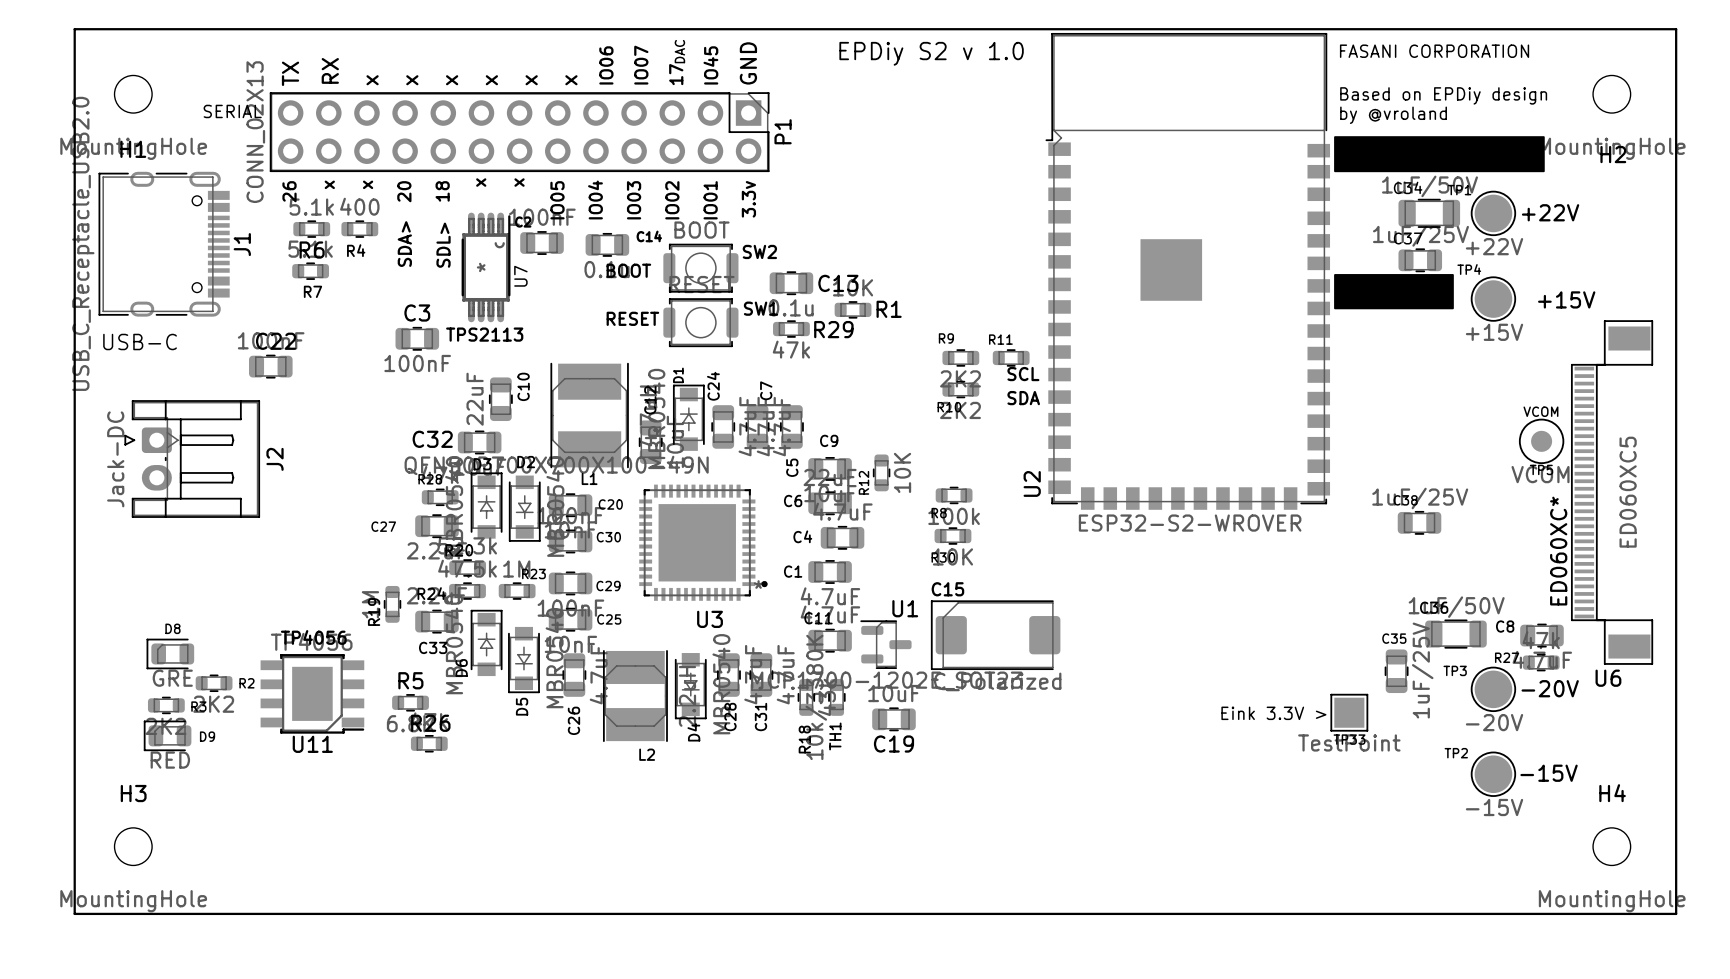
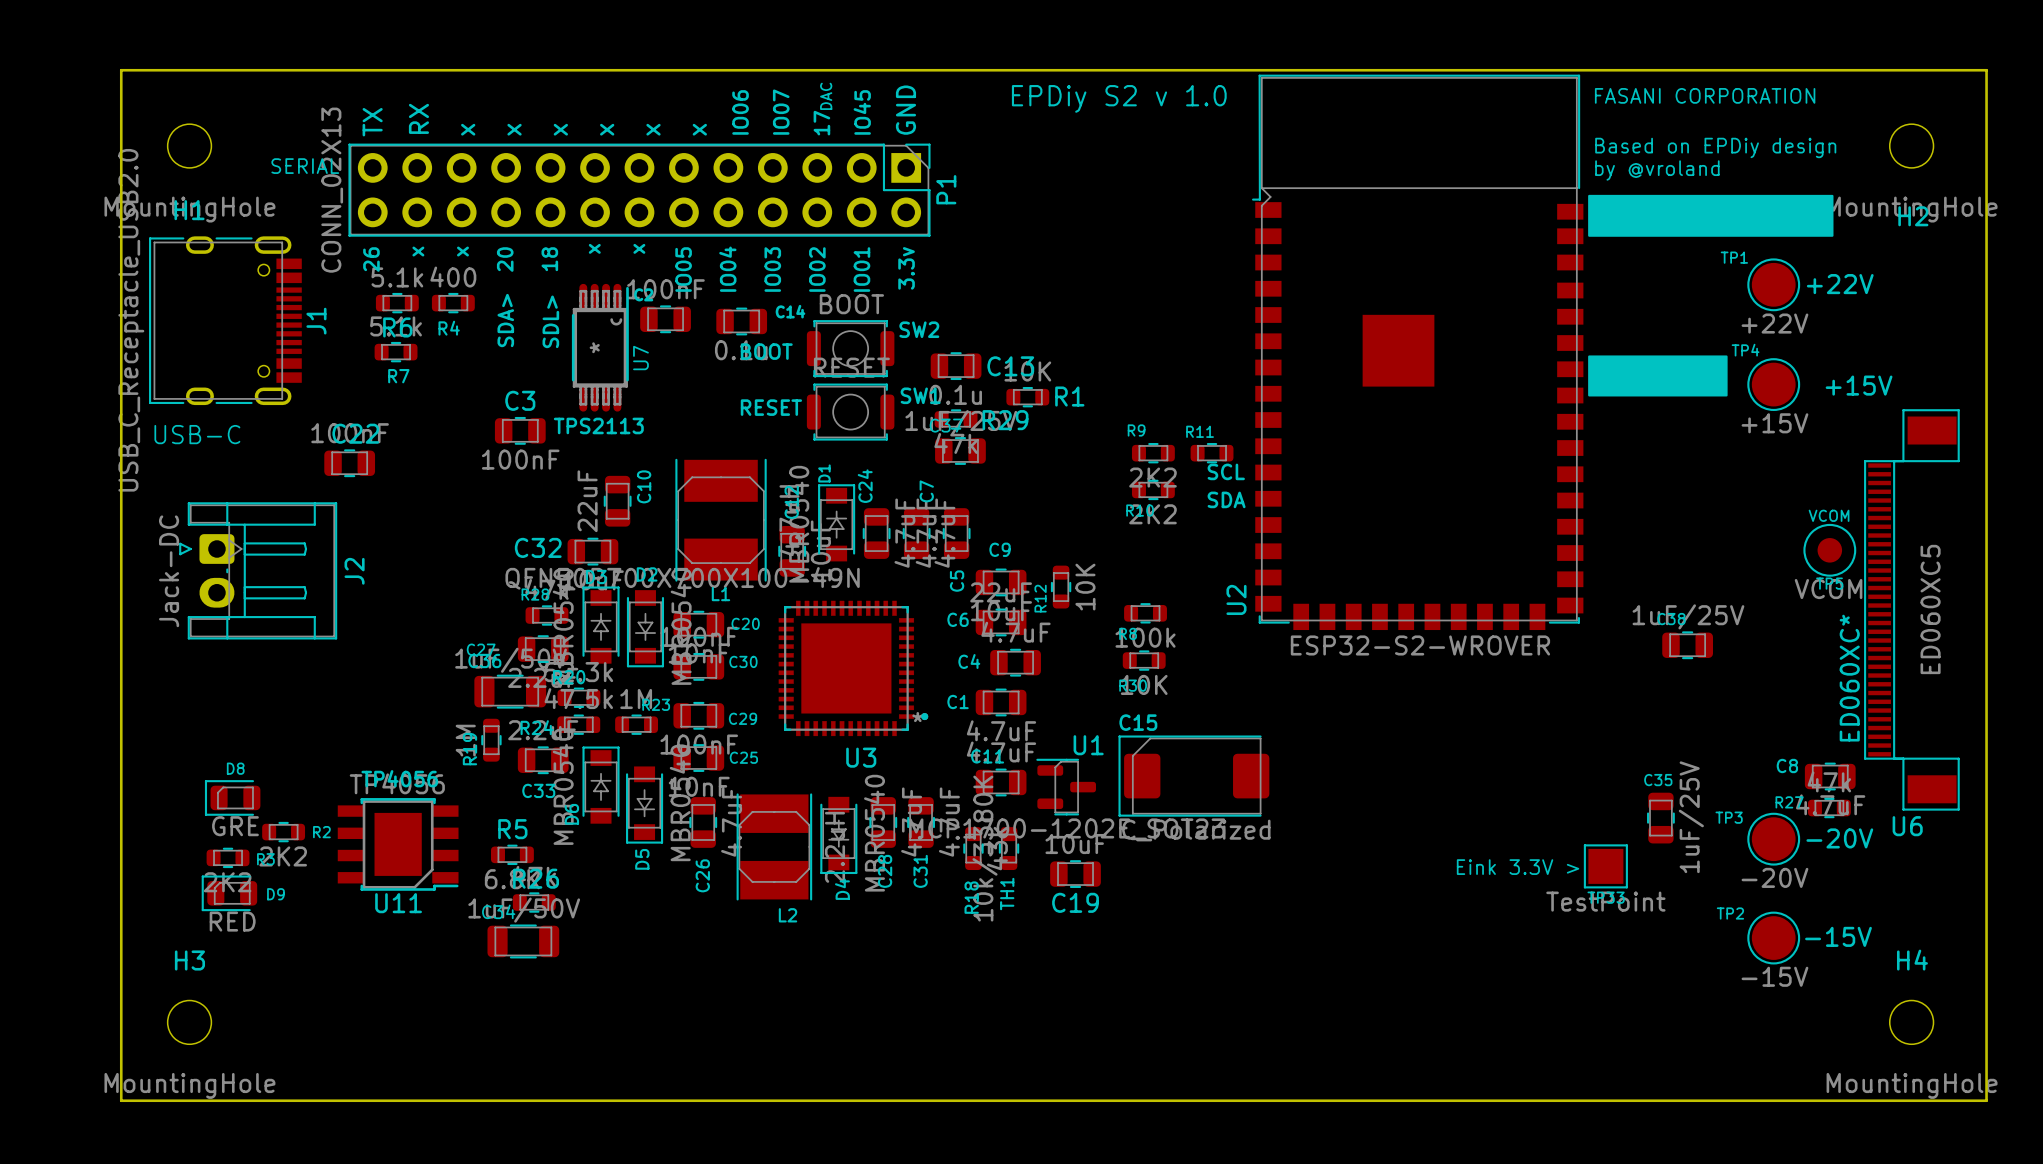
C34 position: (1429, 213) -> (523, 941)
C37 position: (1420, 260) -> (960, 450)
C36 position: (1455, 634) -> (510, 691)

